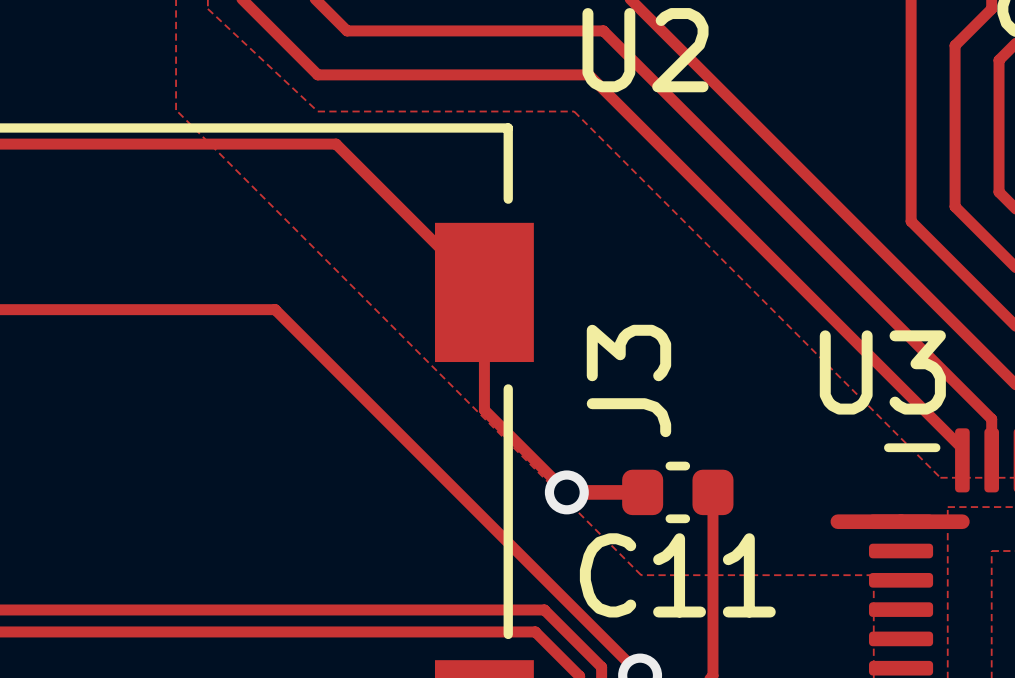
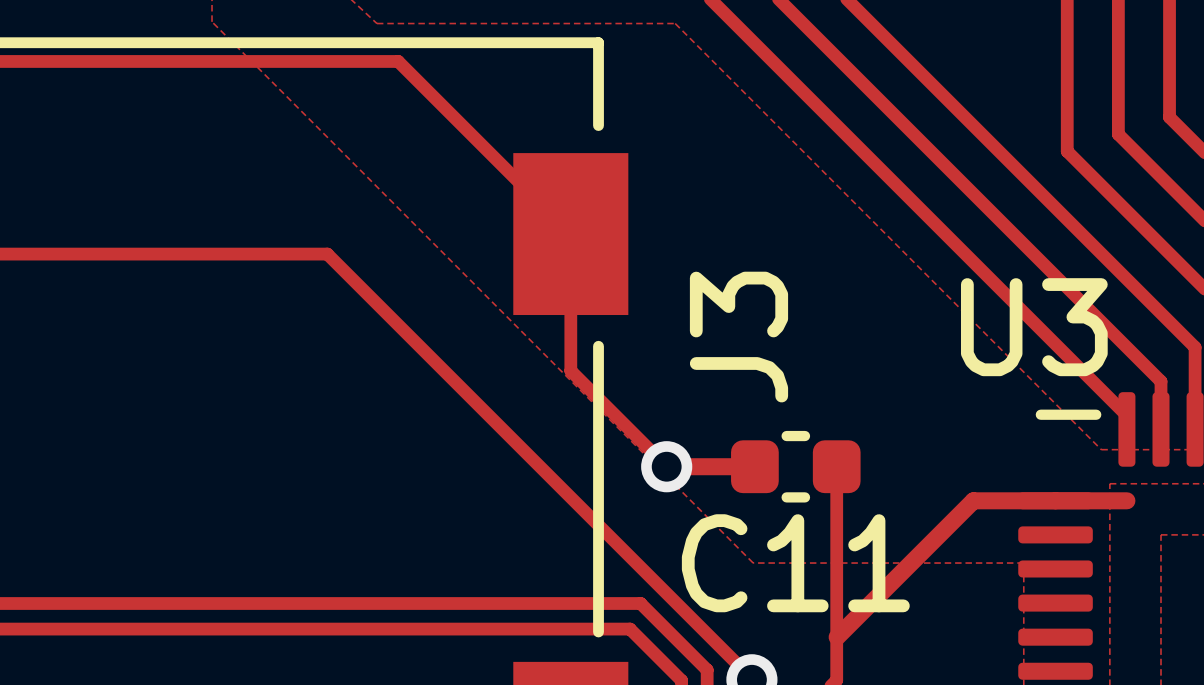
top track: none -> (982, 500) (973, 500) (837, 637)

